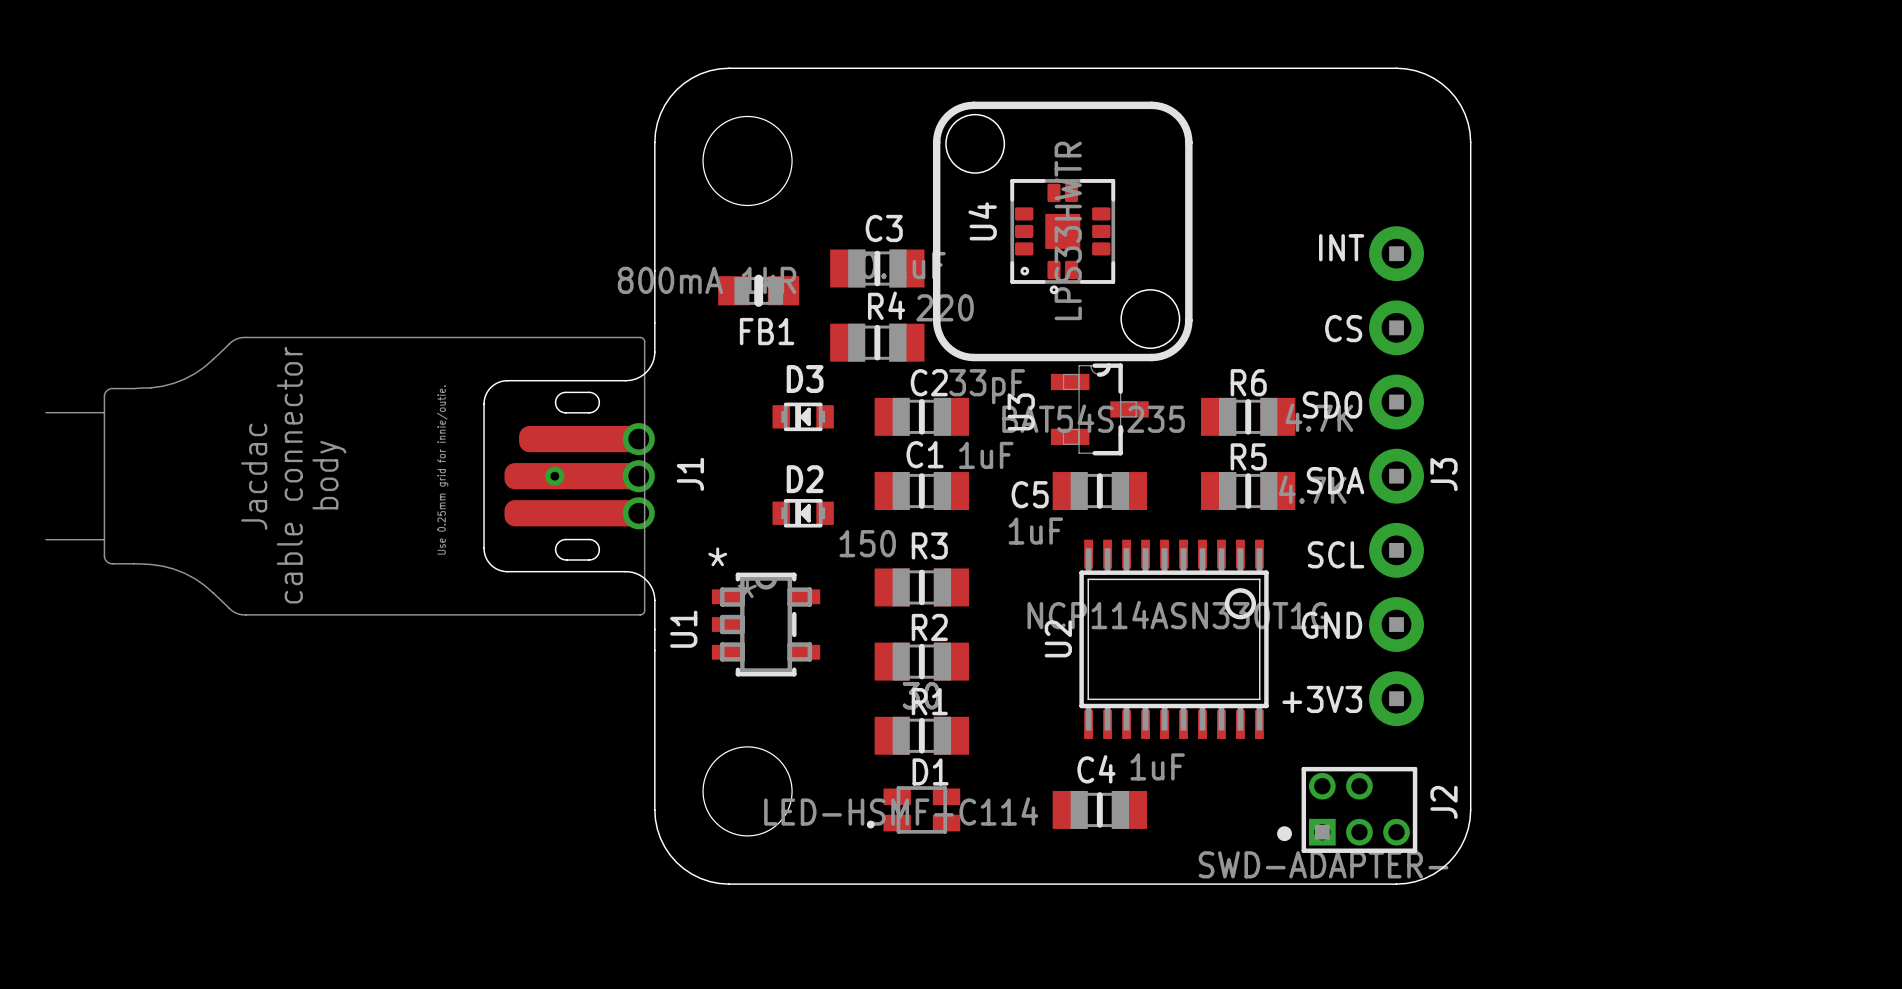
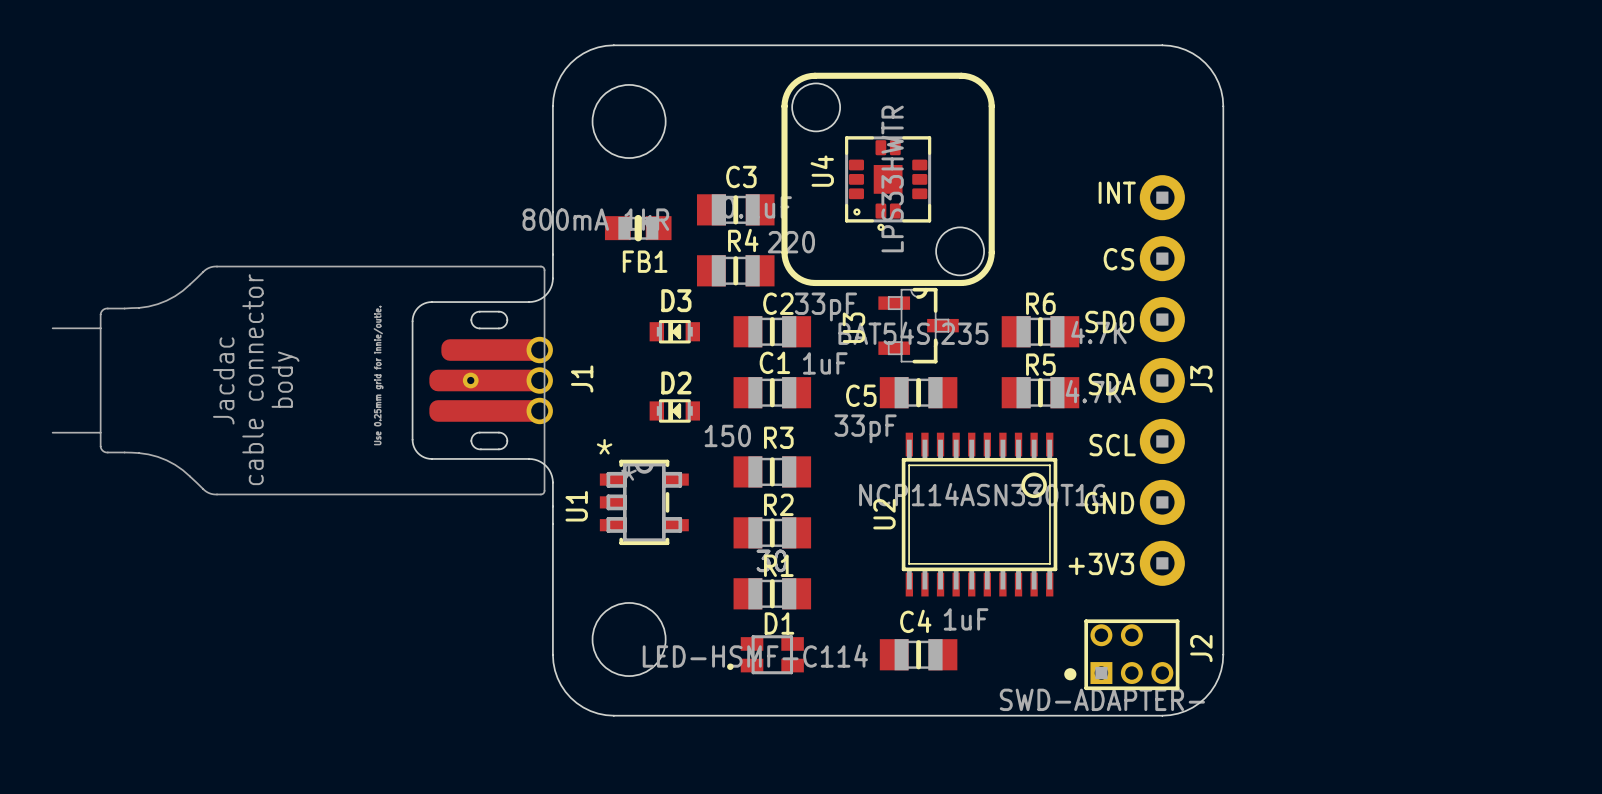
C5 value: 1uF (1035, 531) -> 33pF (865, 428)

